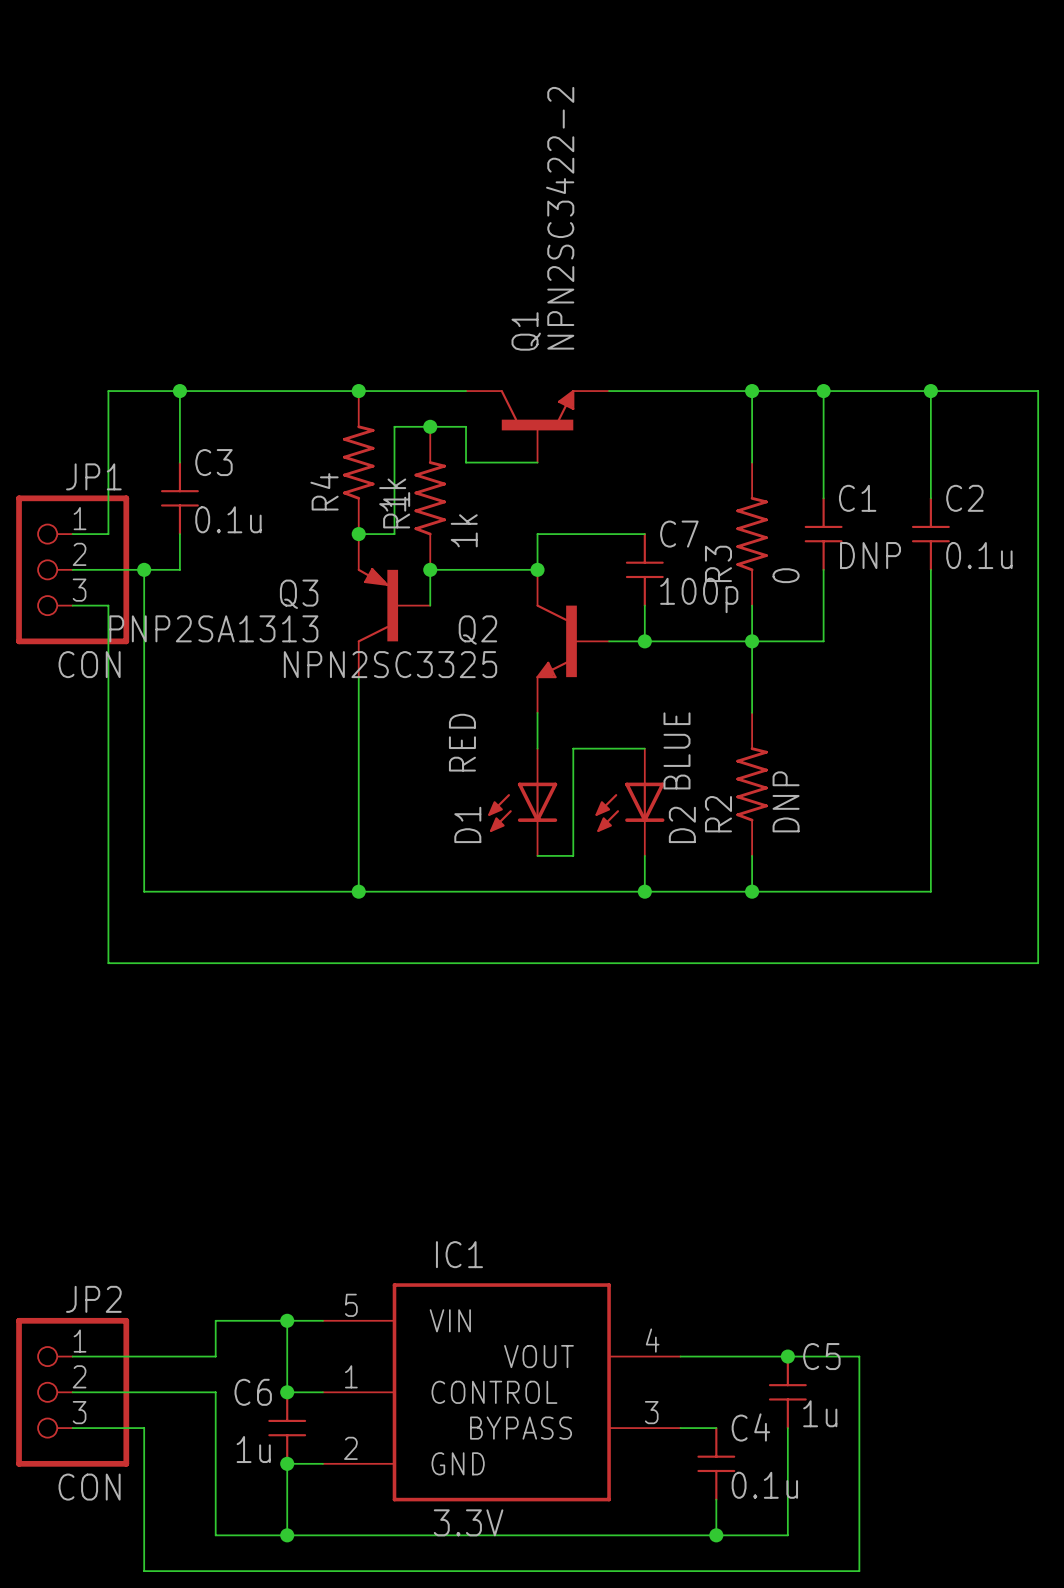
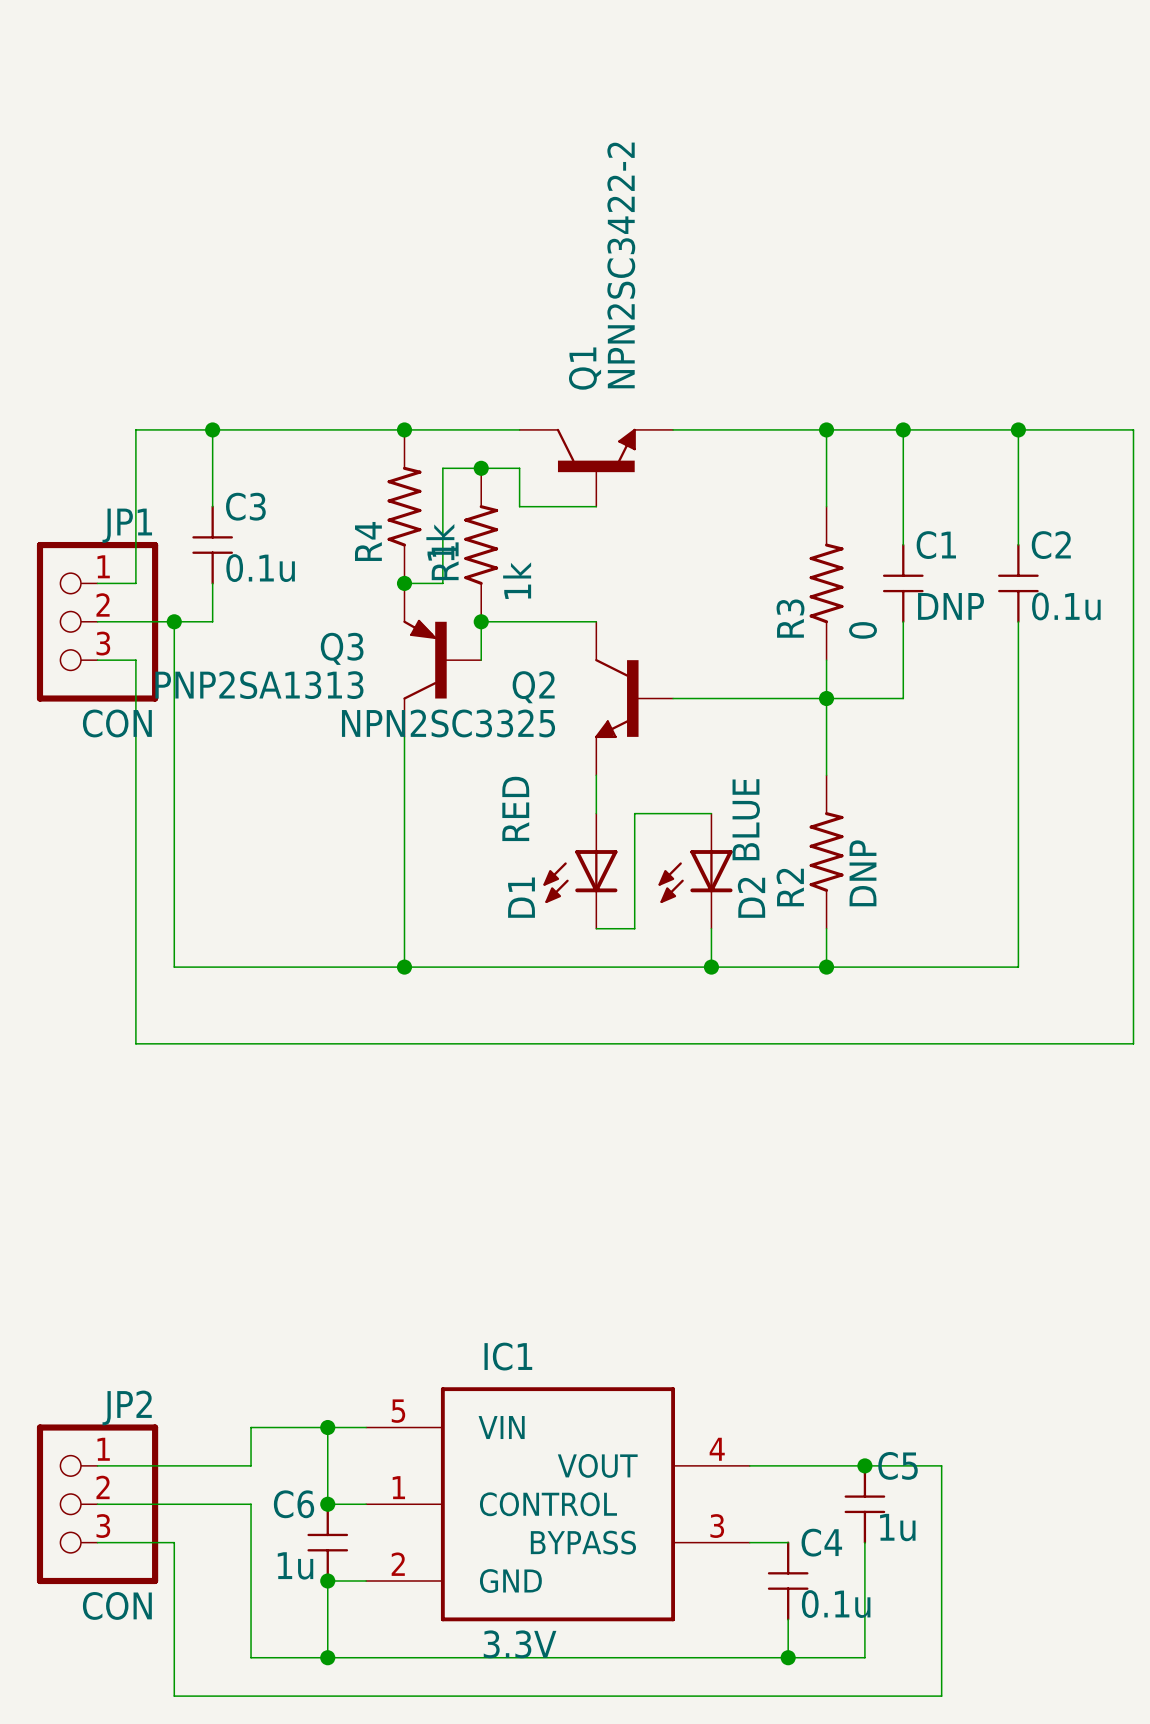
wire: (644, 534) (537, 534) (537, 569) -> none
junction: (537, 569) -> none
C7: 100p (644, 569) -> none
wire: (644, 605) (644, 641) -> none
junction: (644, 641) -> none

